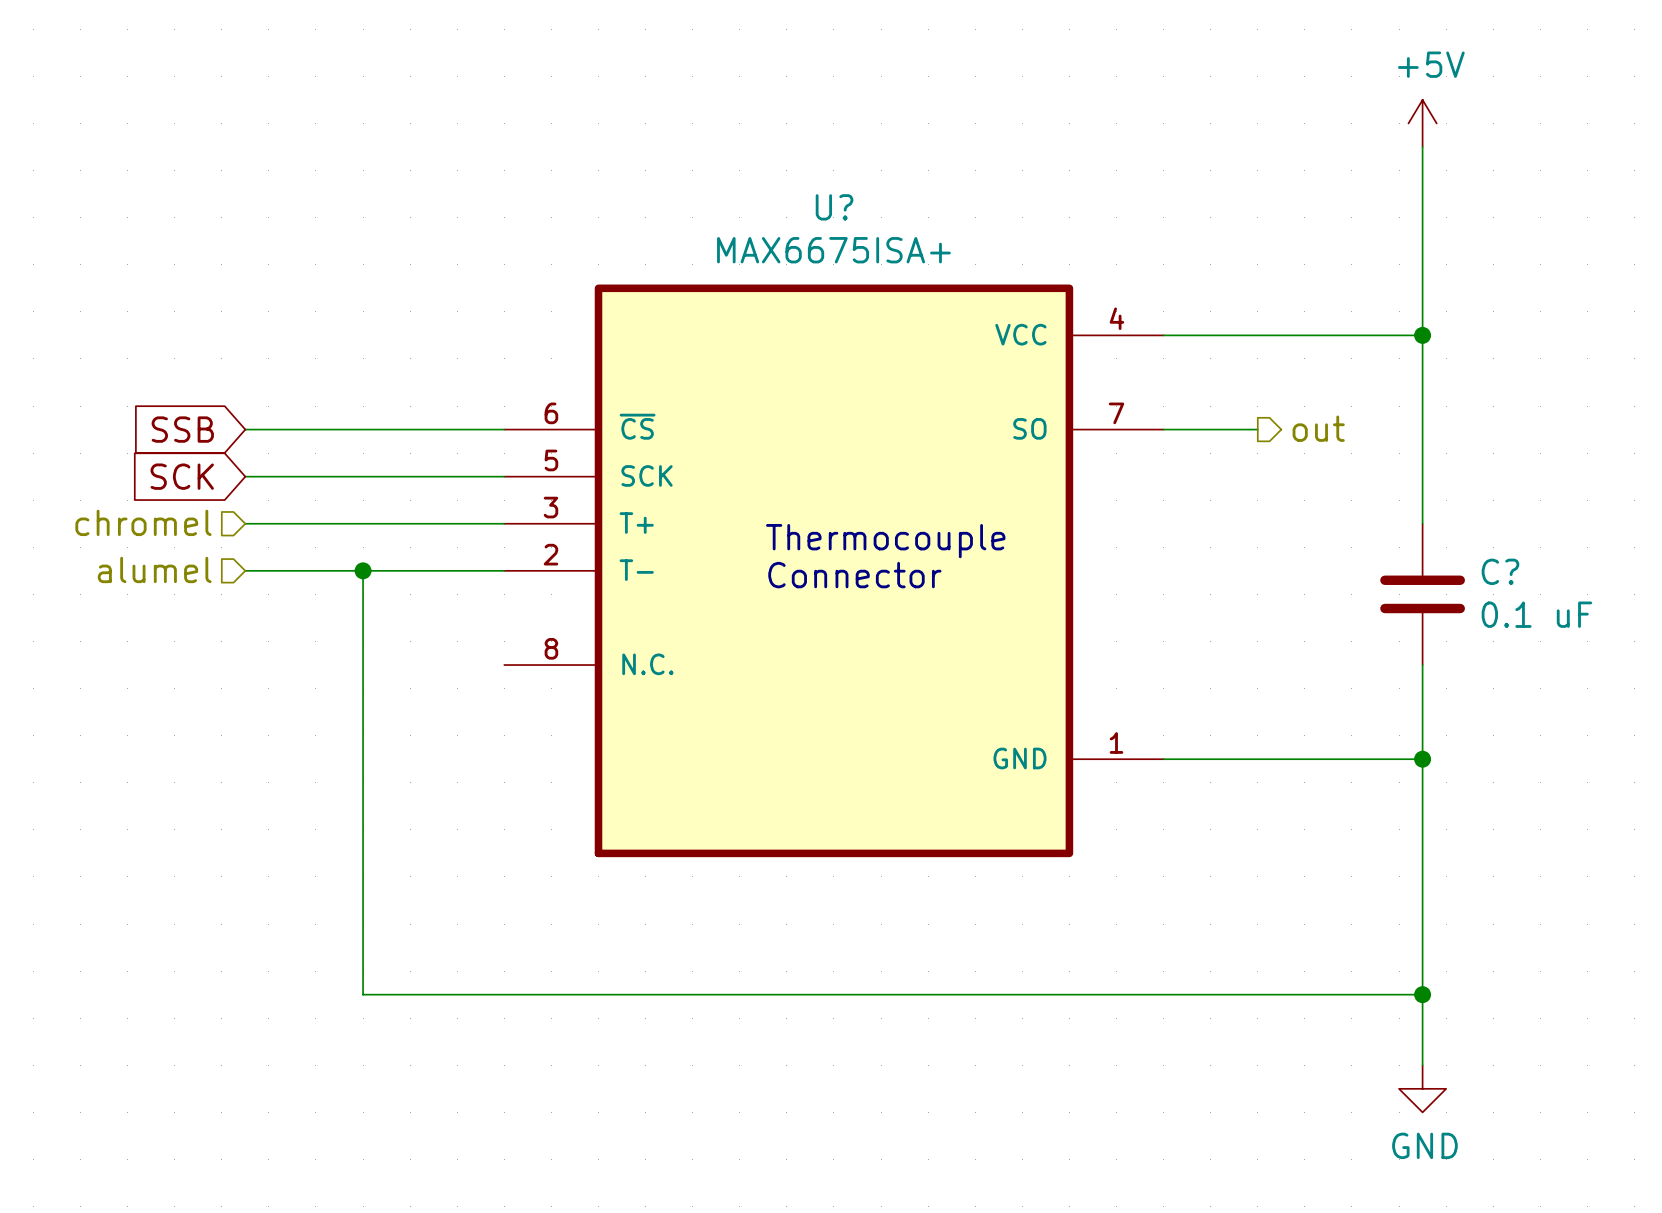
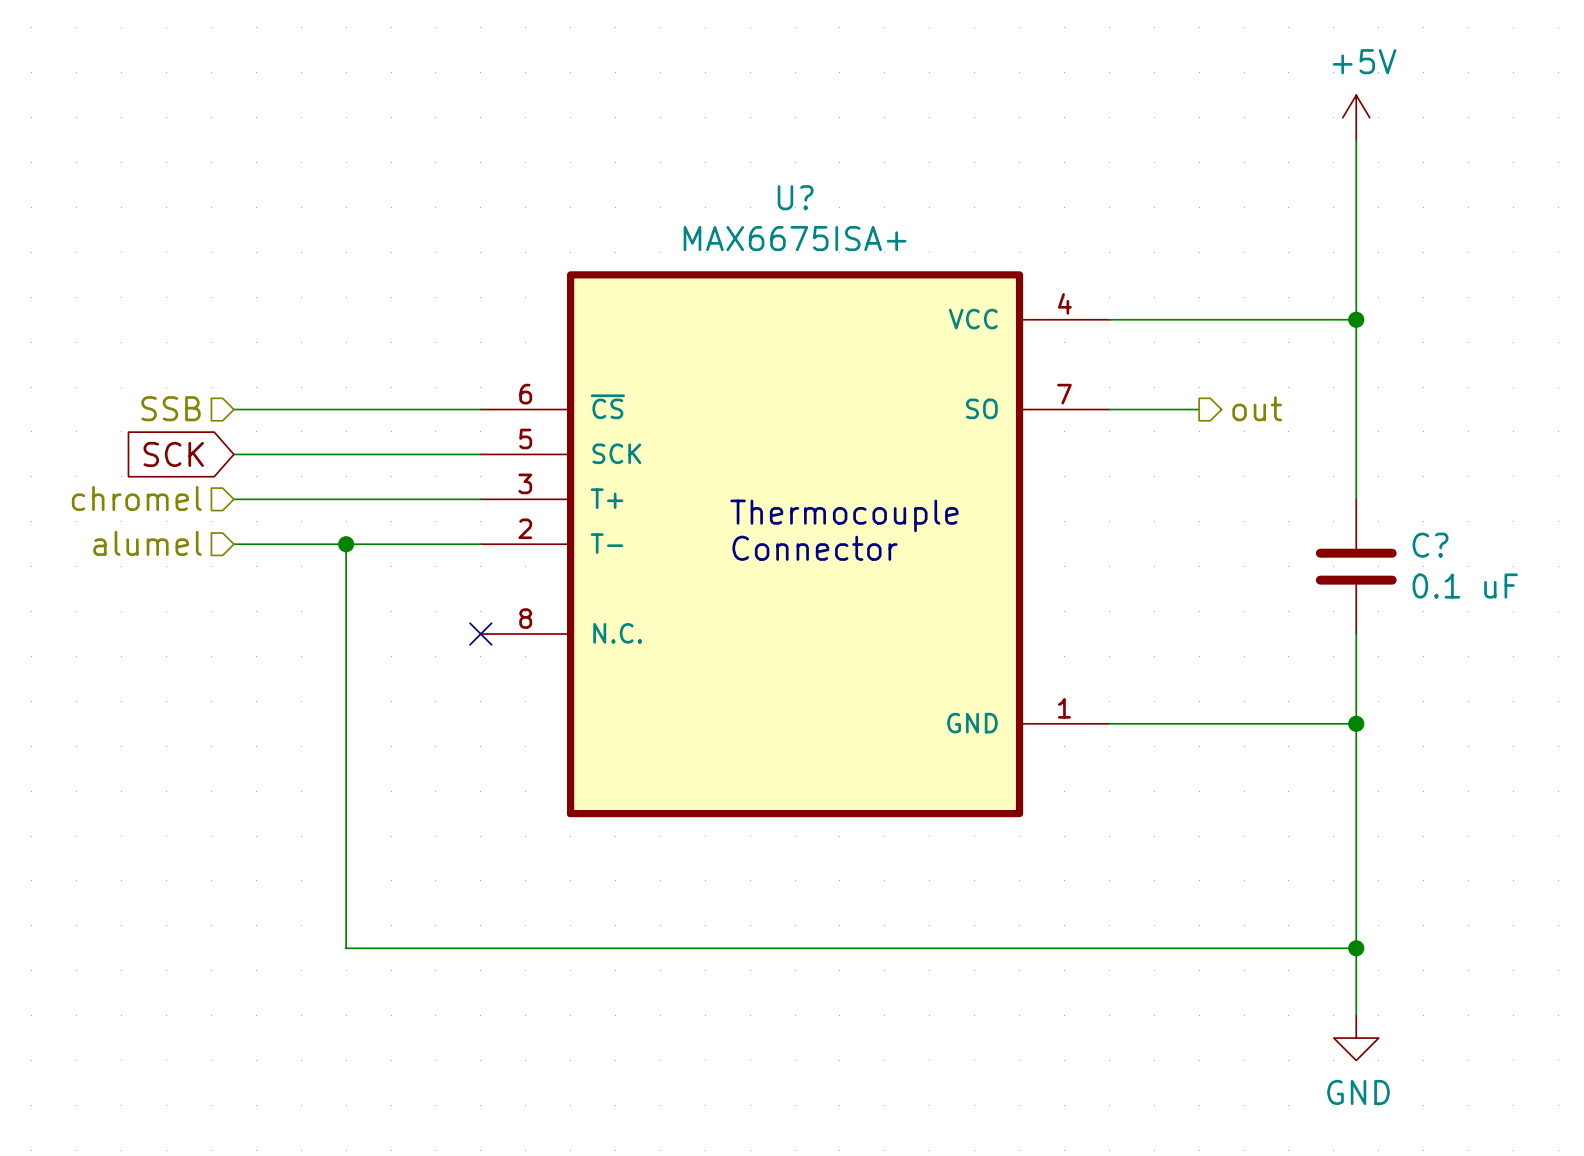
hierarchical label: none -> SSB (171, 408)
global label: SSB (182, 429) -> none
no-connect mark: none -> (480, 634)

